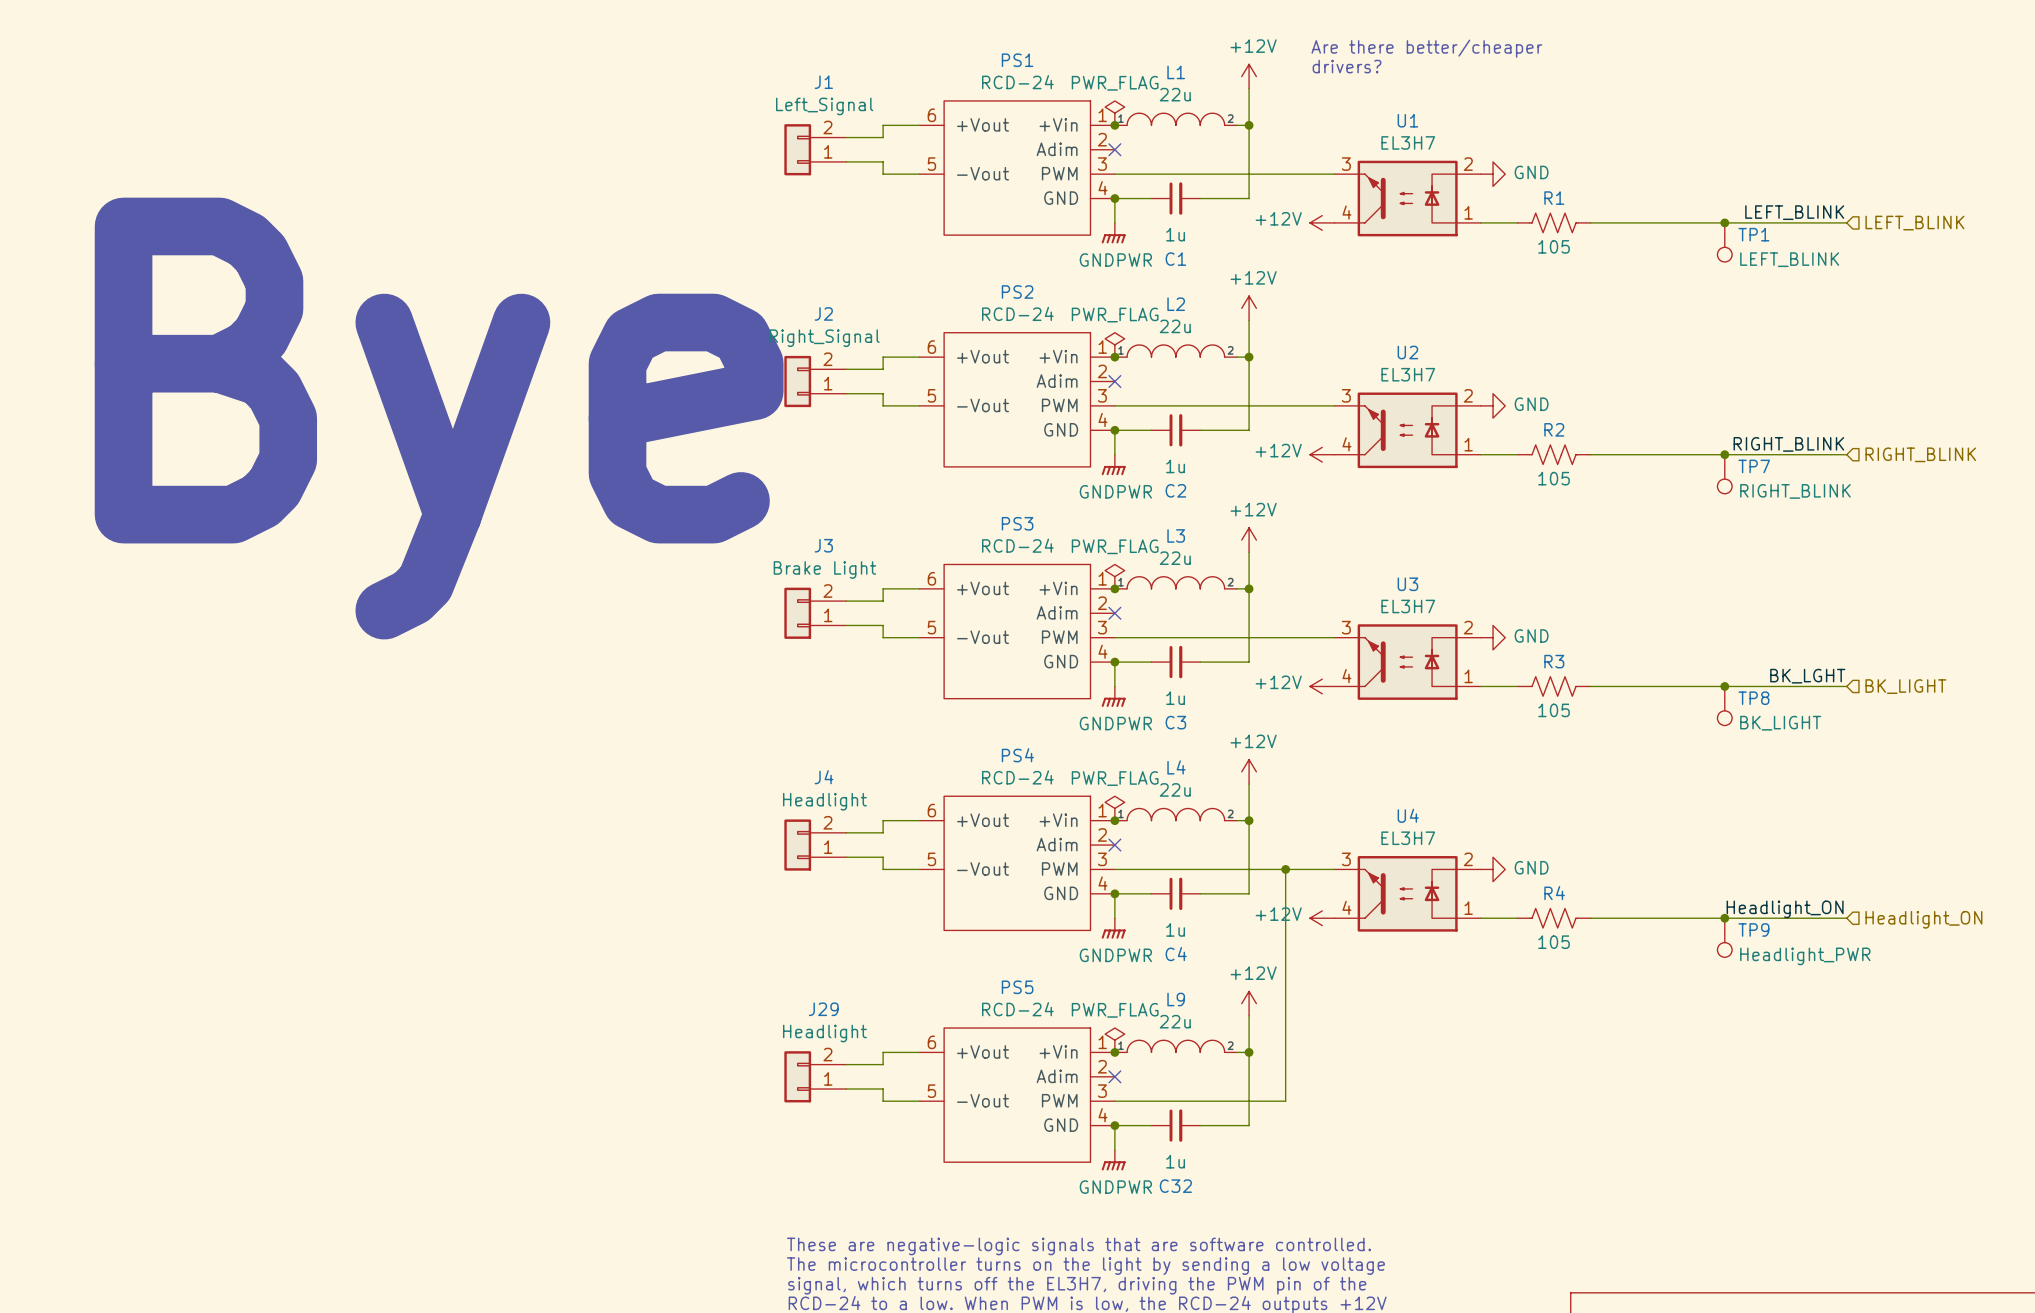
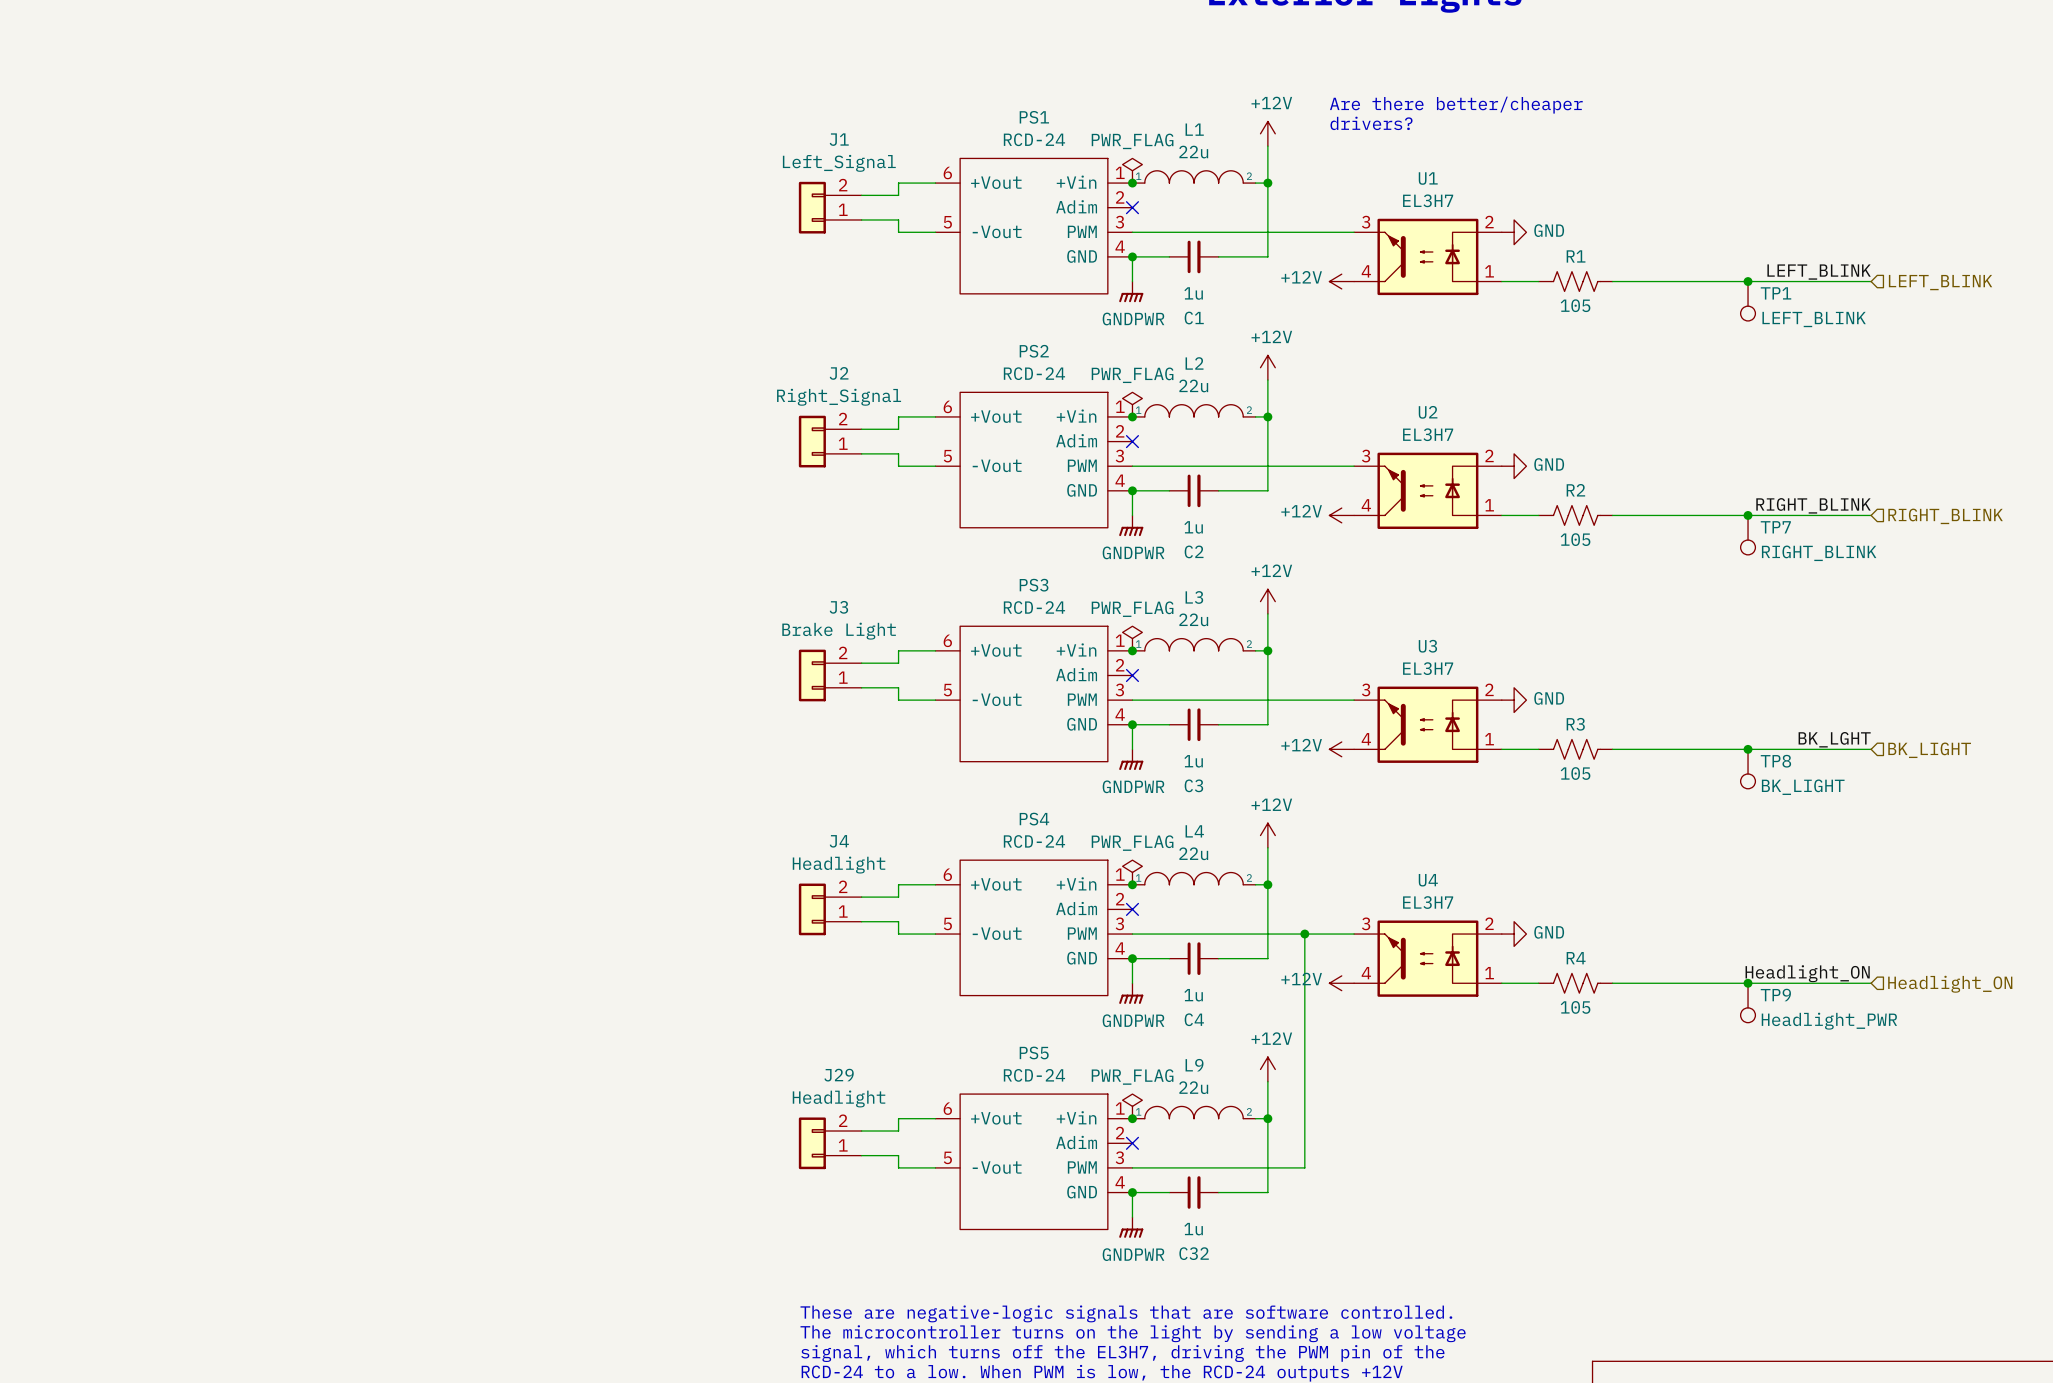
text: Bye (439, 418) -> none

